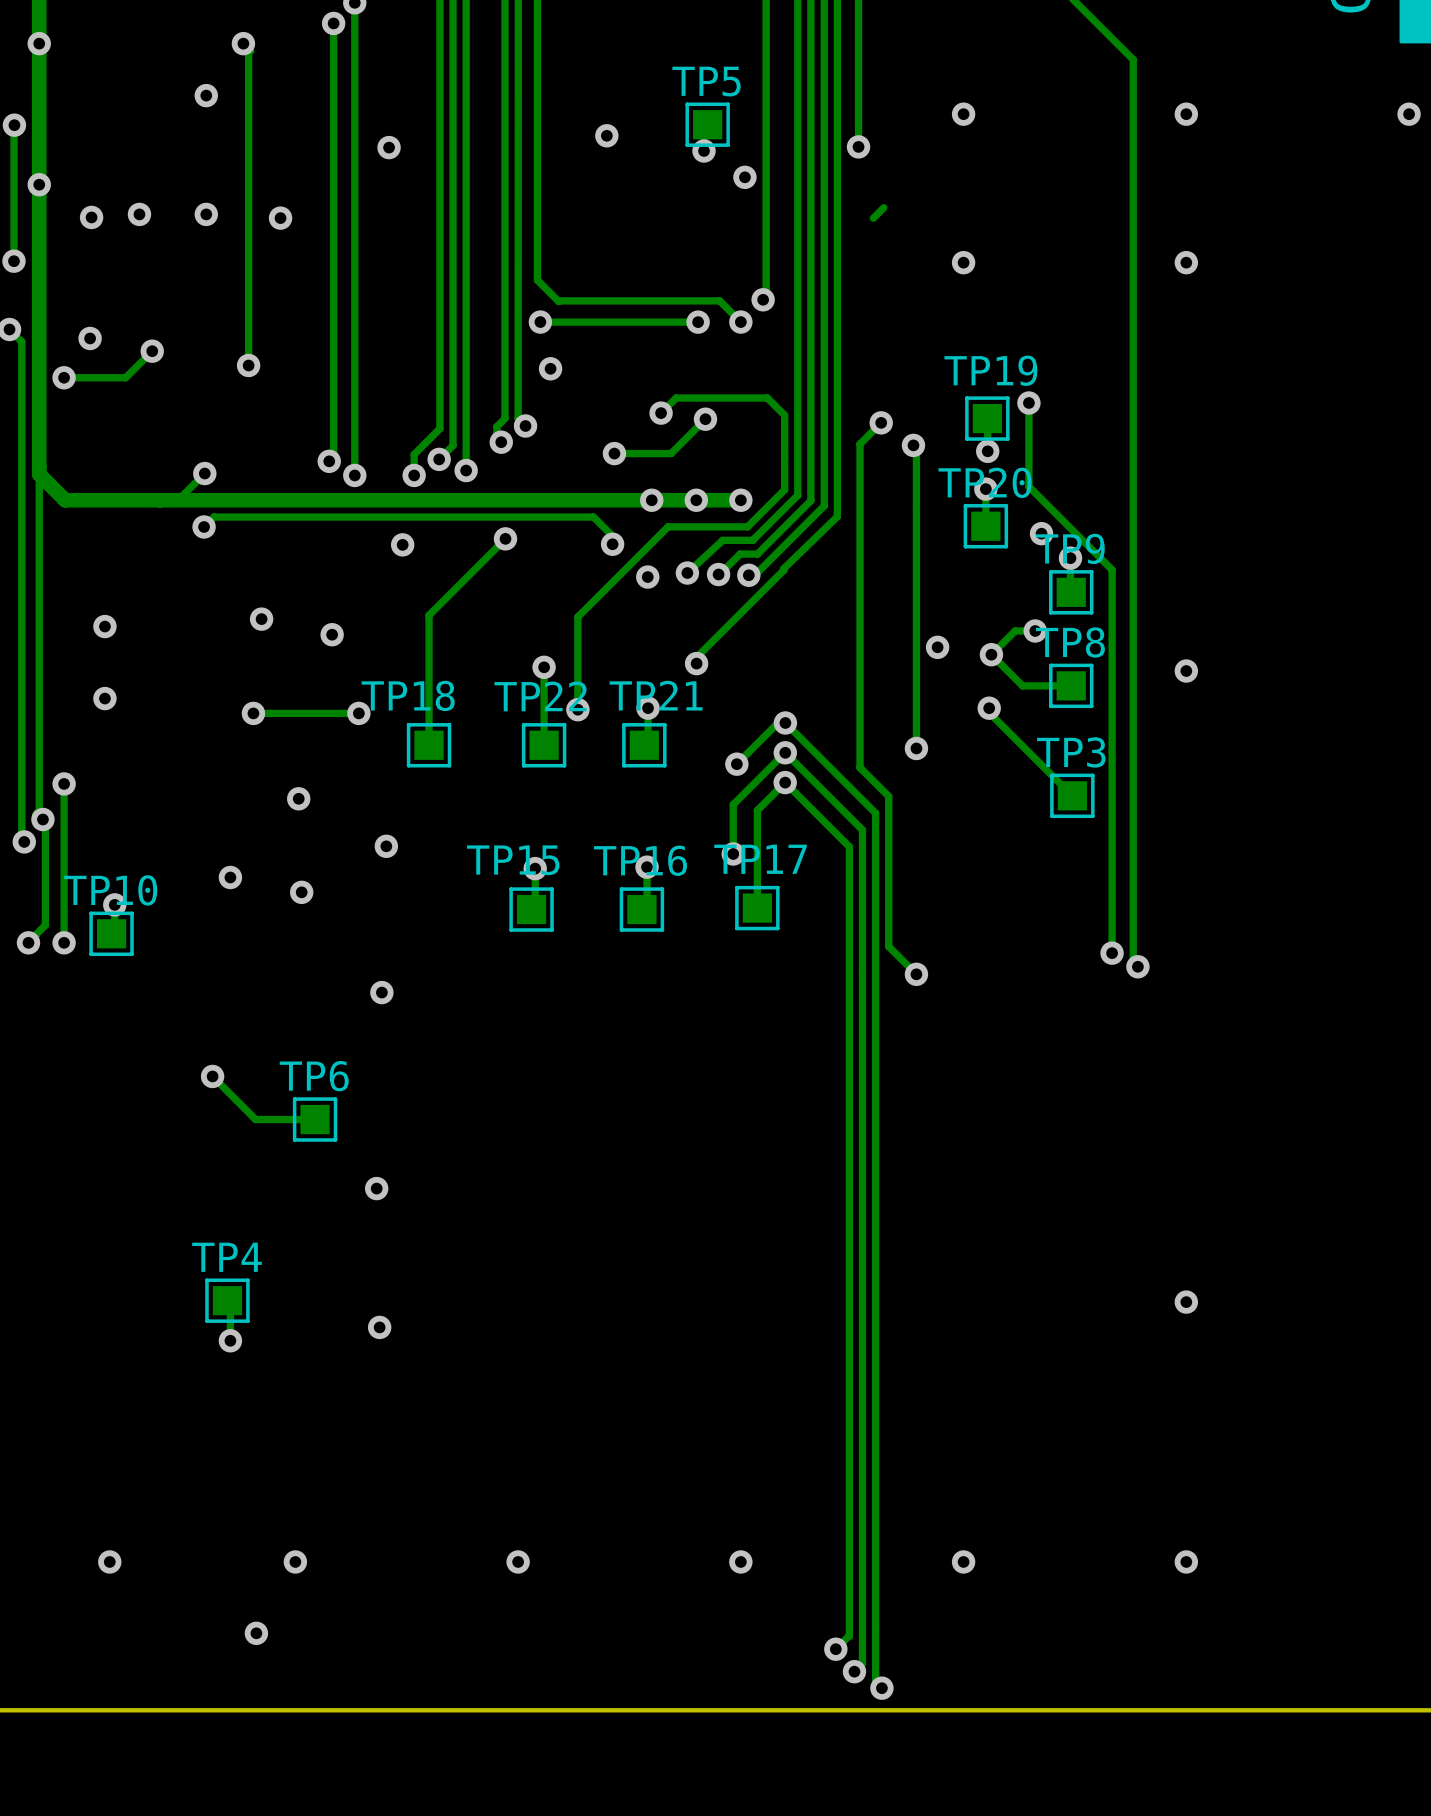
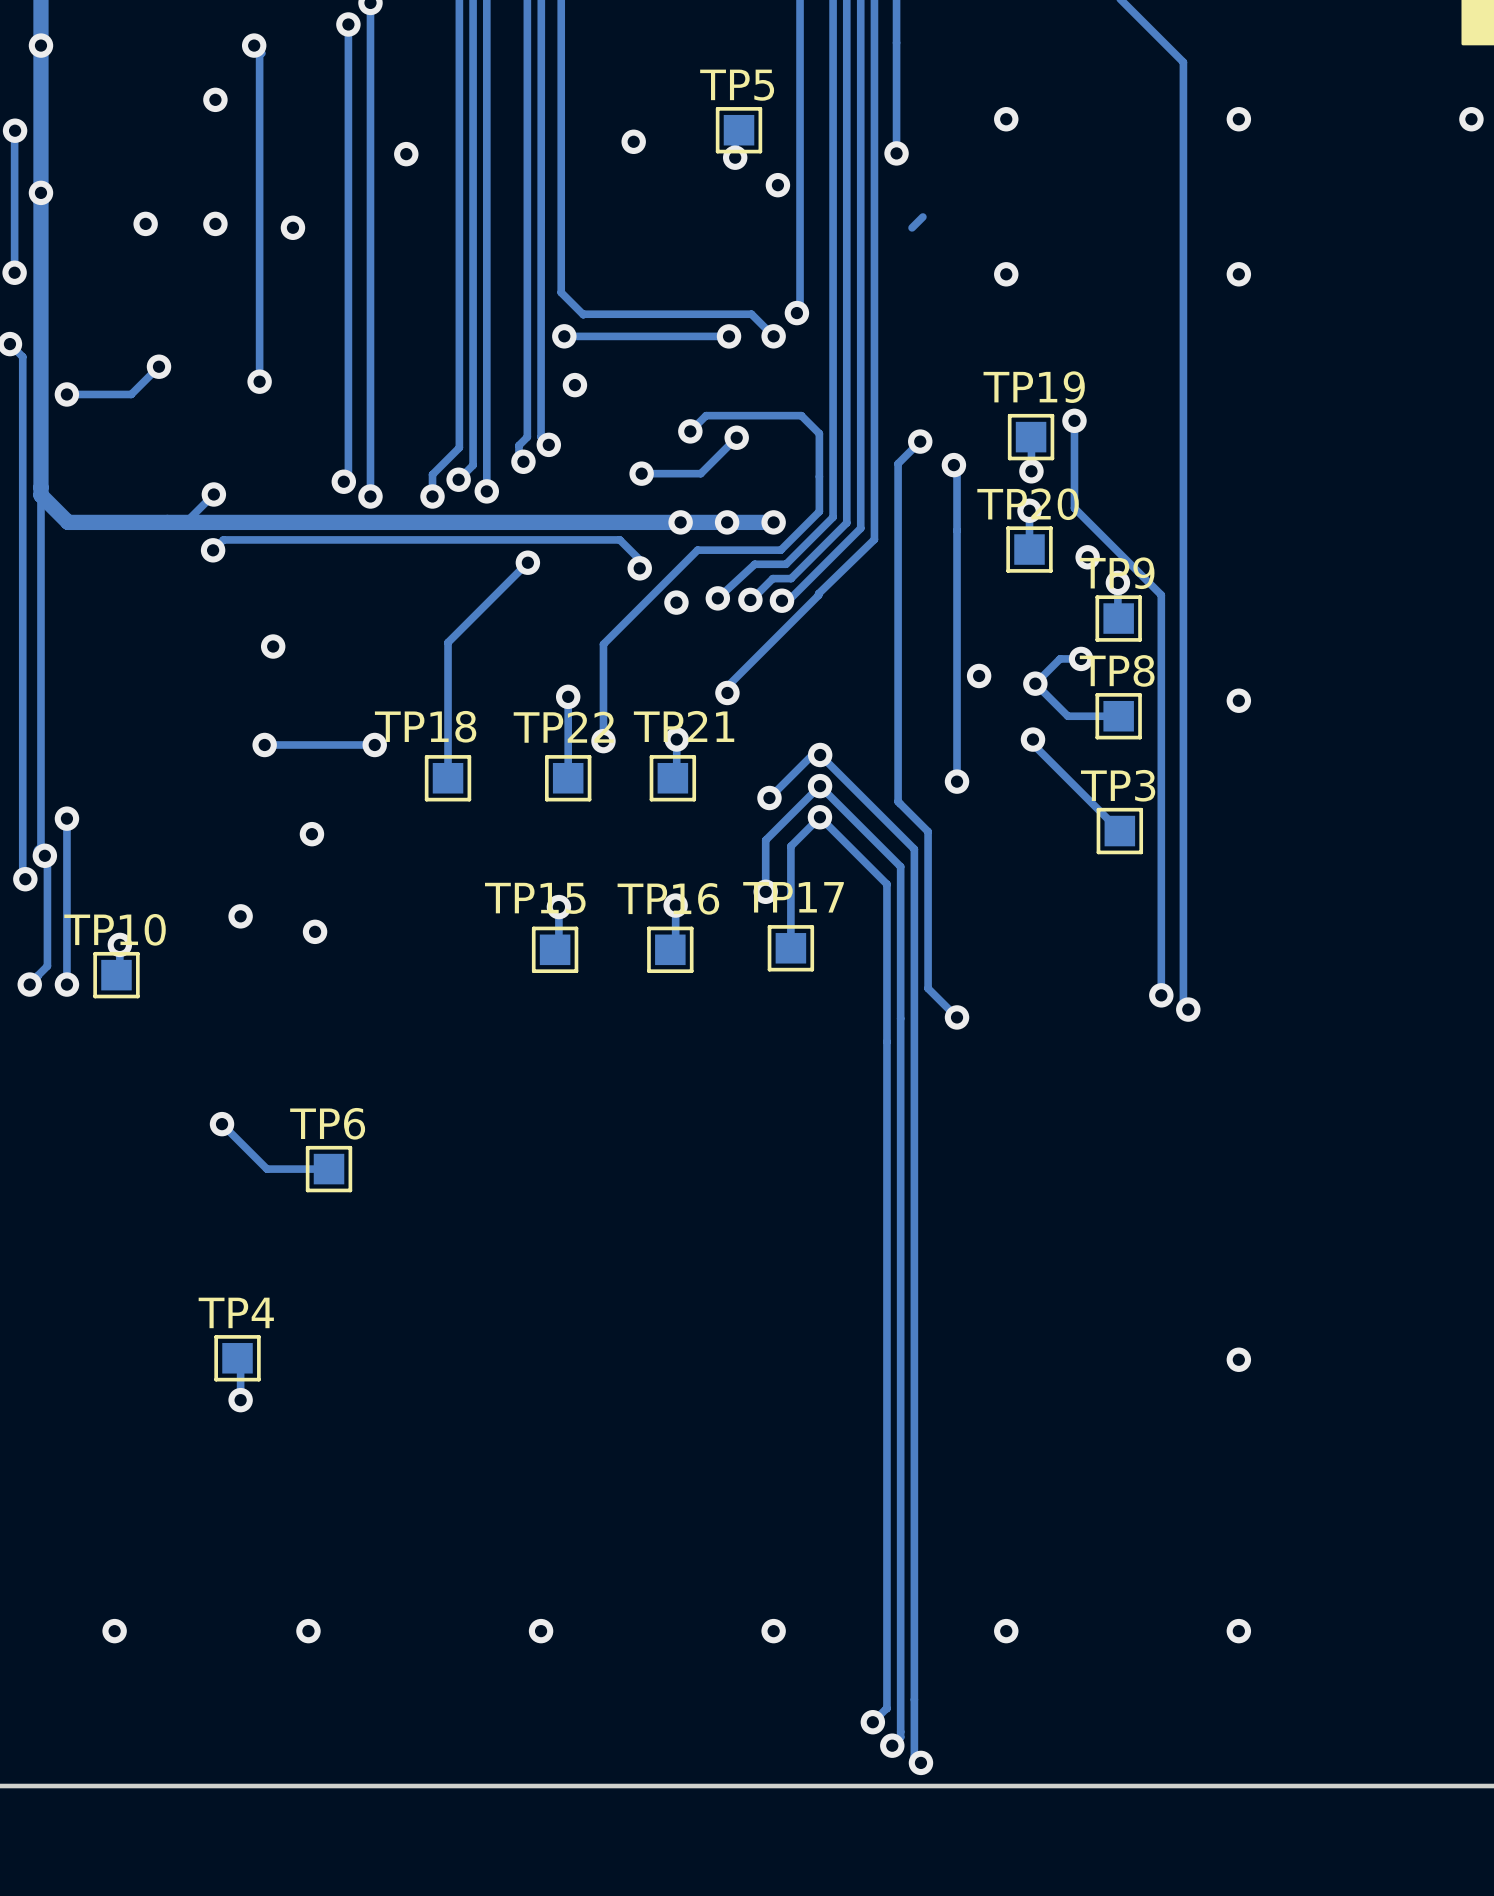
via: (91, 217) -> none
via: (90, 338) -> none
via: (402, 544) -> none
via: (104, 626) -> none
via: (332, 634) -> none
via: (104, 698) -> none
via: (386, 846) -> none
via: (381, 992) -> none
via: (376, 1188) -> none
via: (379, 1327) -> none
via: (256, 1633) -> none

